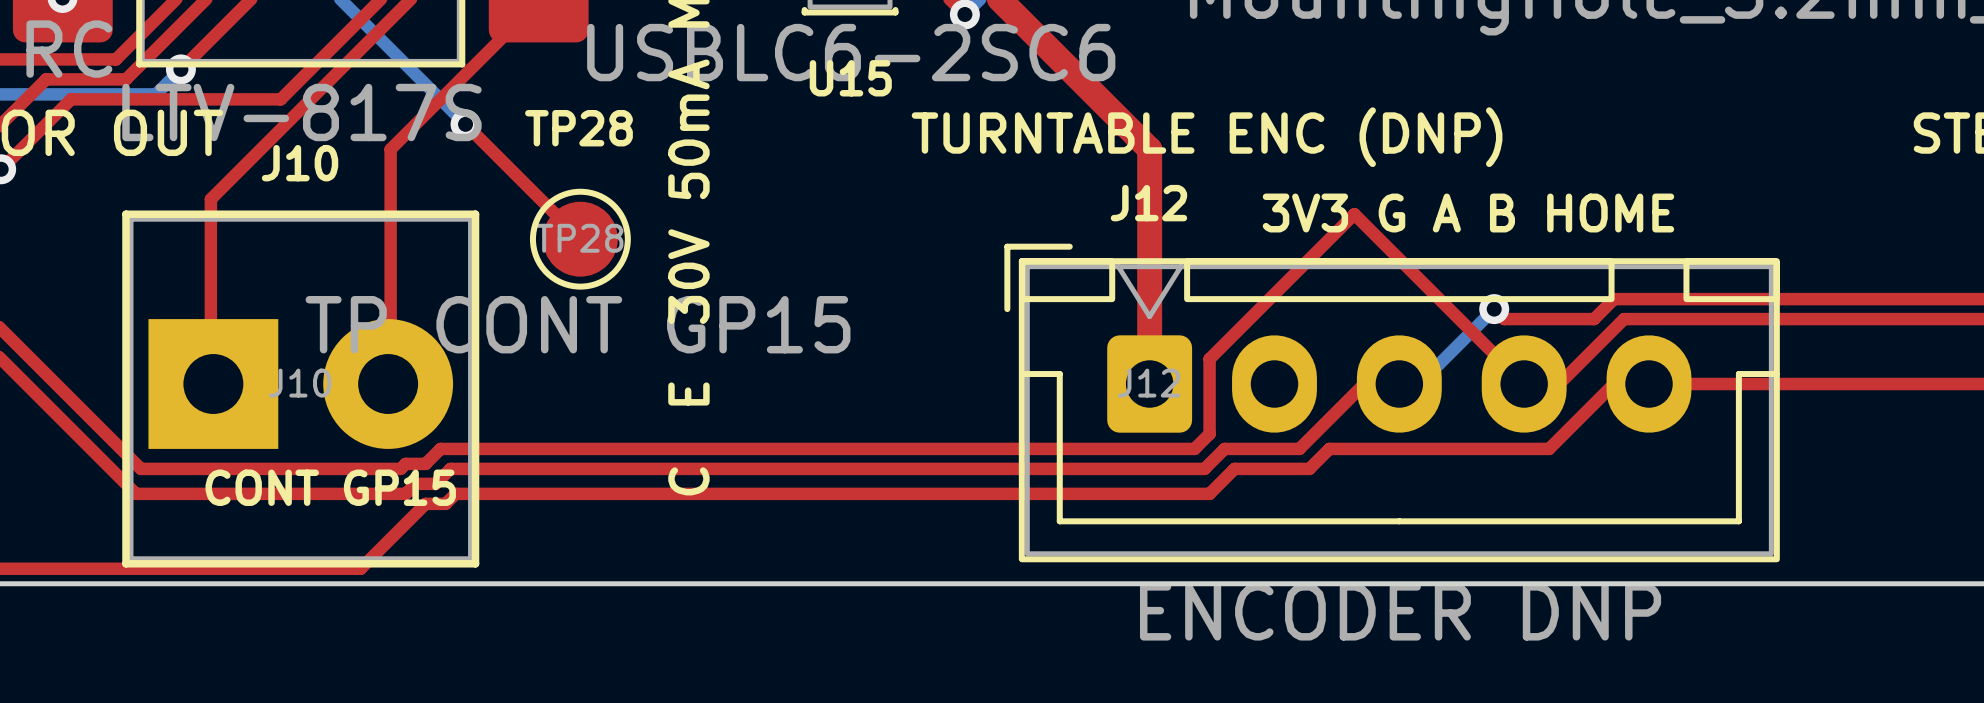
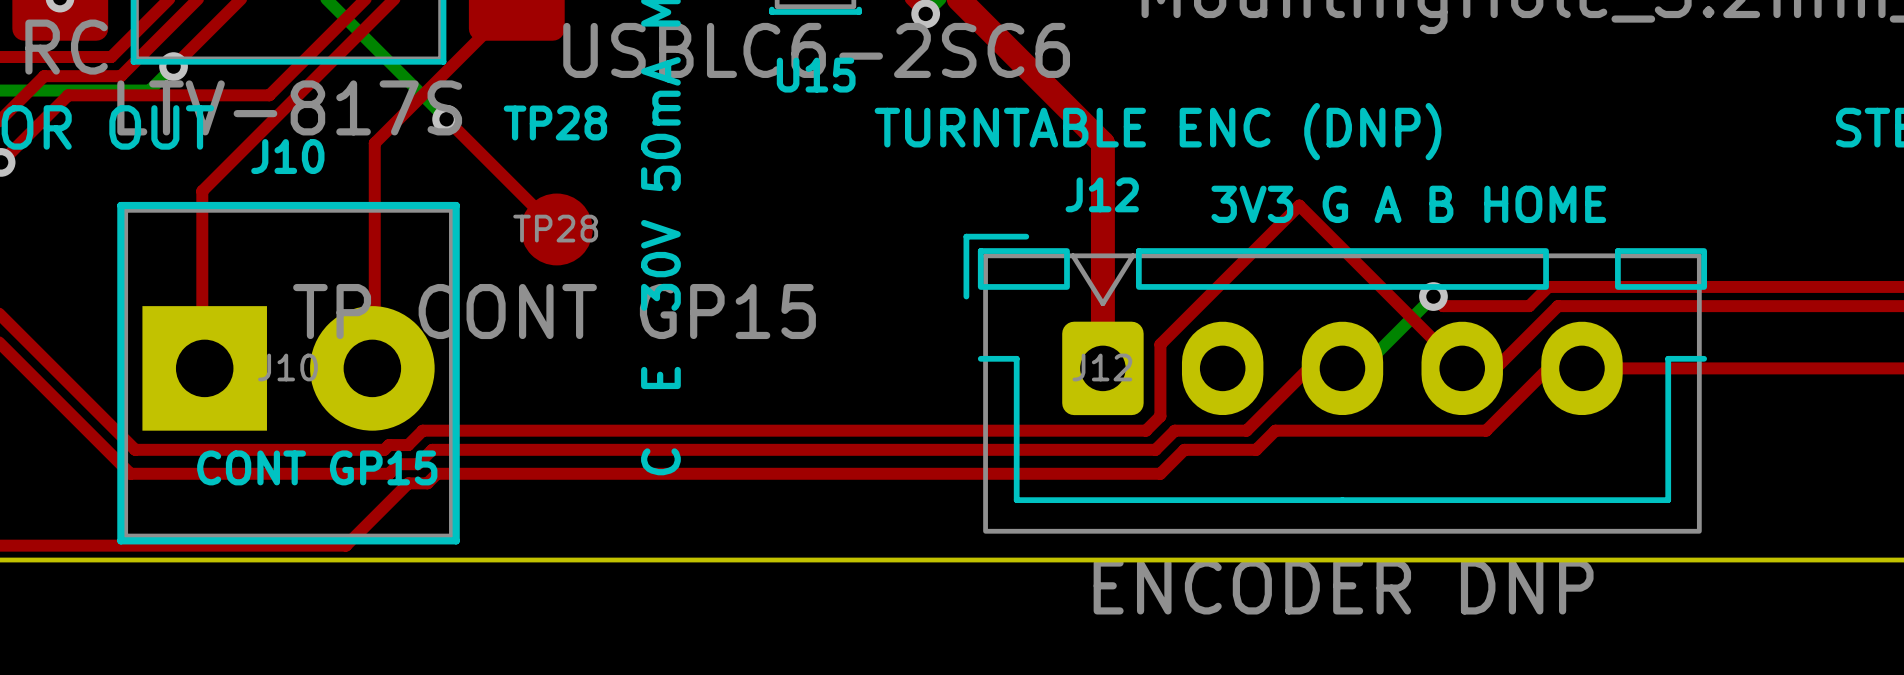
TP28 footprint: [529, 188, 631, 290] -> [520, 193, 593, 266]
J12 footprint: [1004, 243, 1780, 563] -> [963, 233, 1708, 534]

